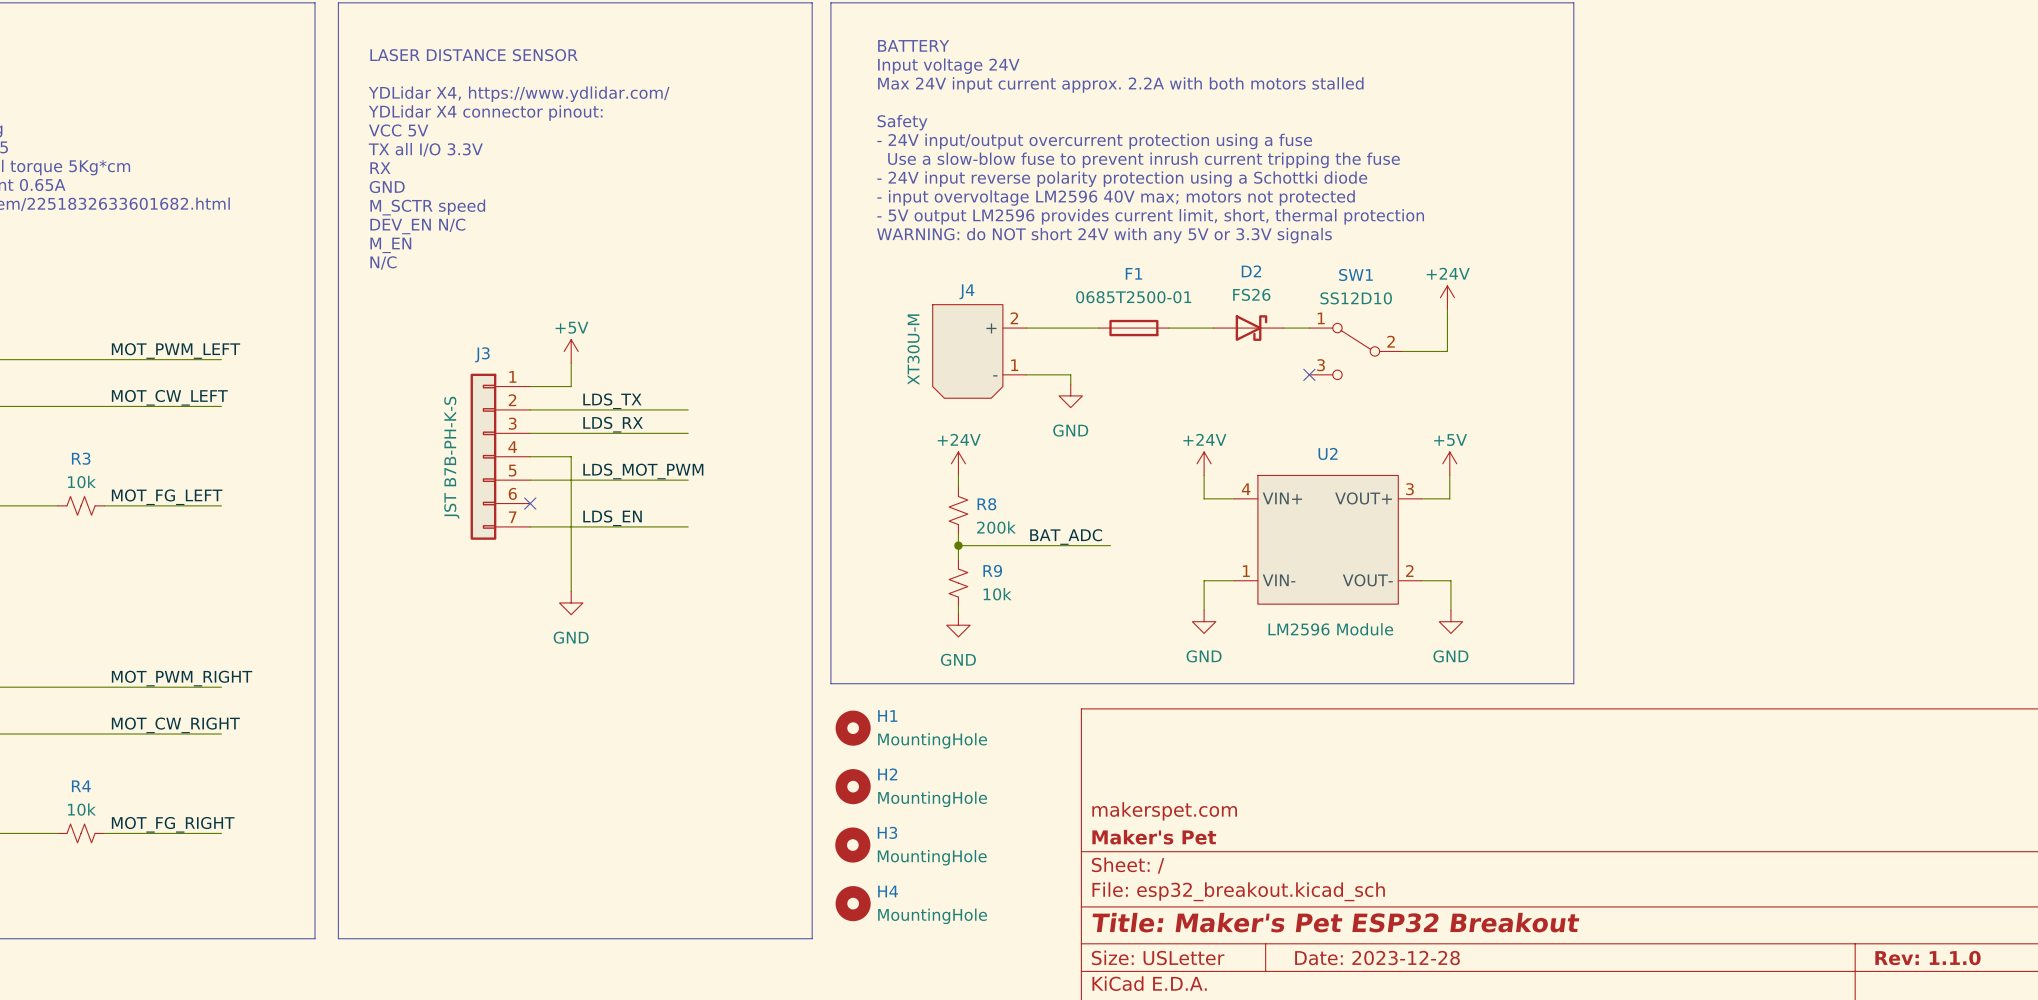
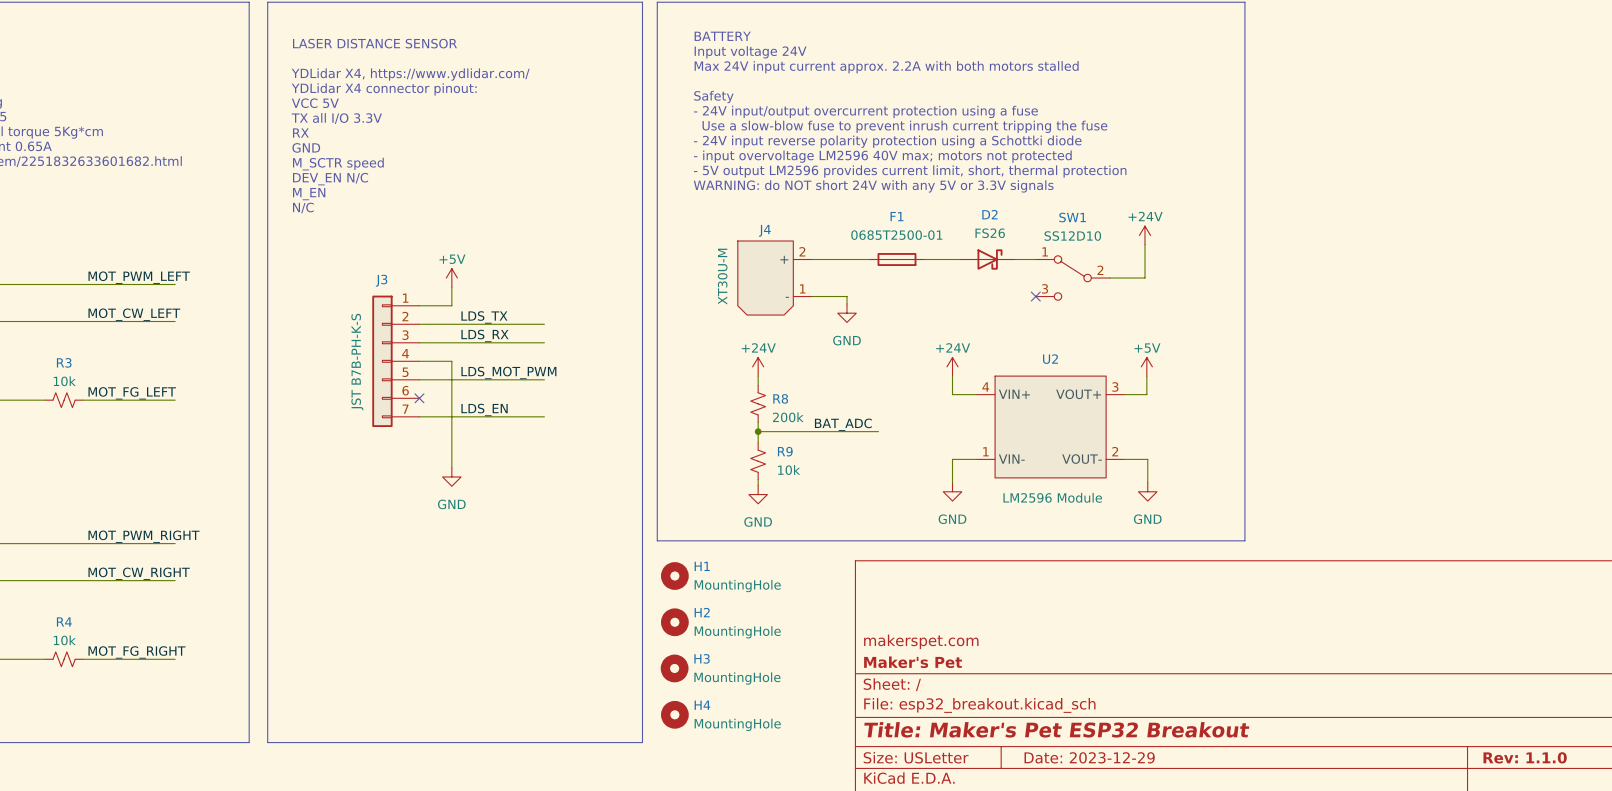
title block: Date: 2023-12-28 (1377, 958) -> Date: 2023-12-29 (1089, 757)

